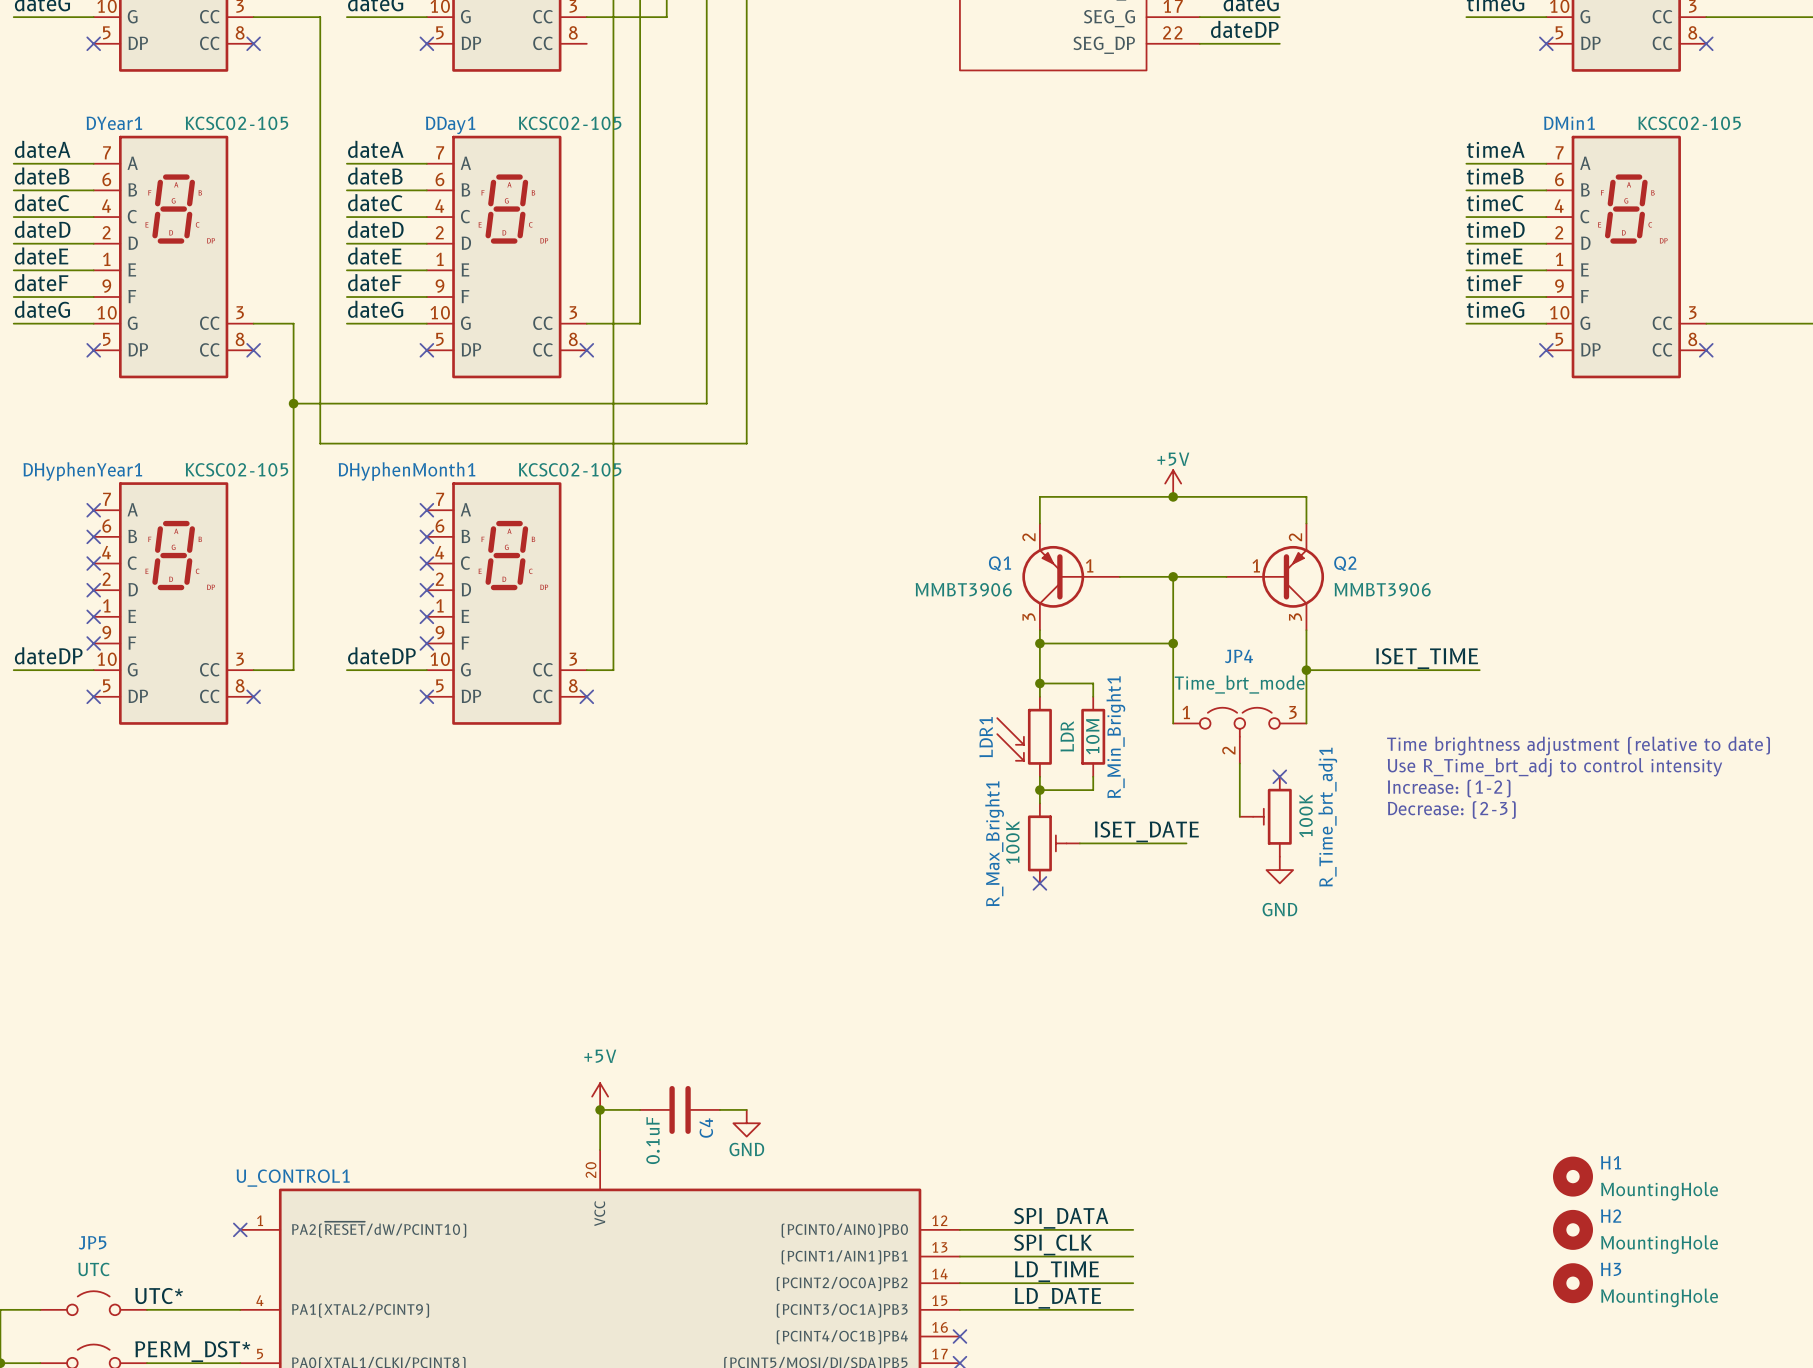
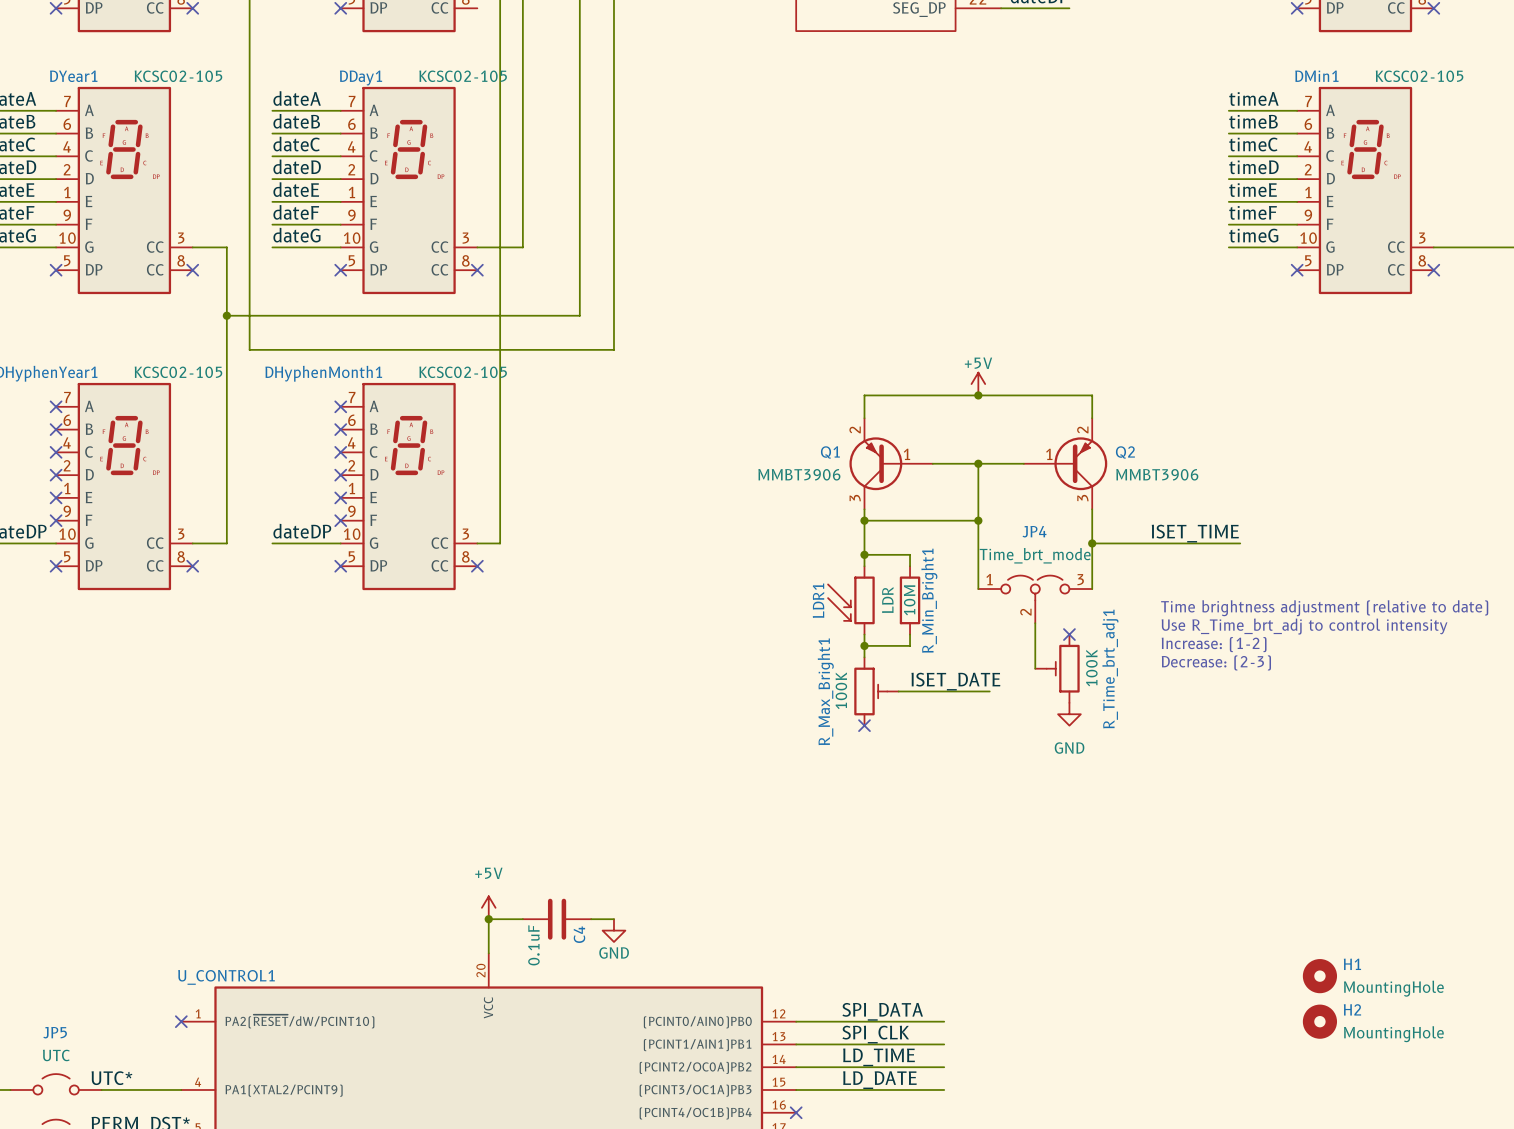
H3: MountingHole (1573, 1283) -> none

